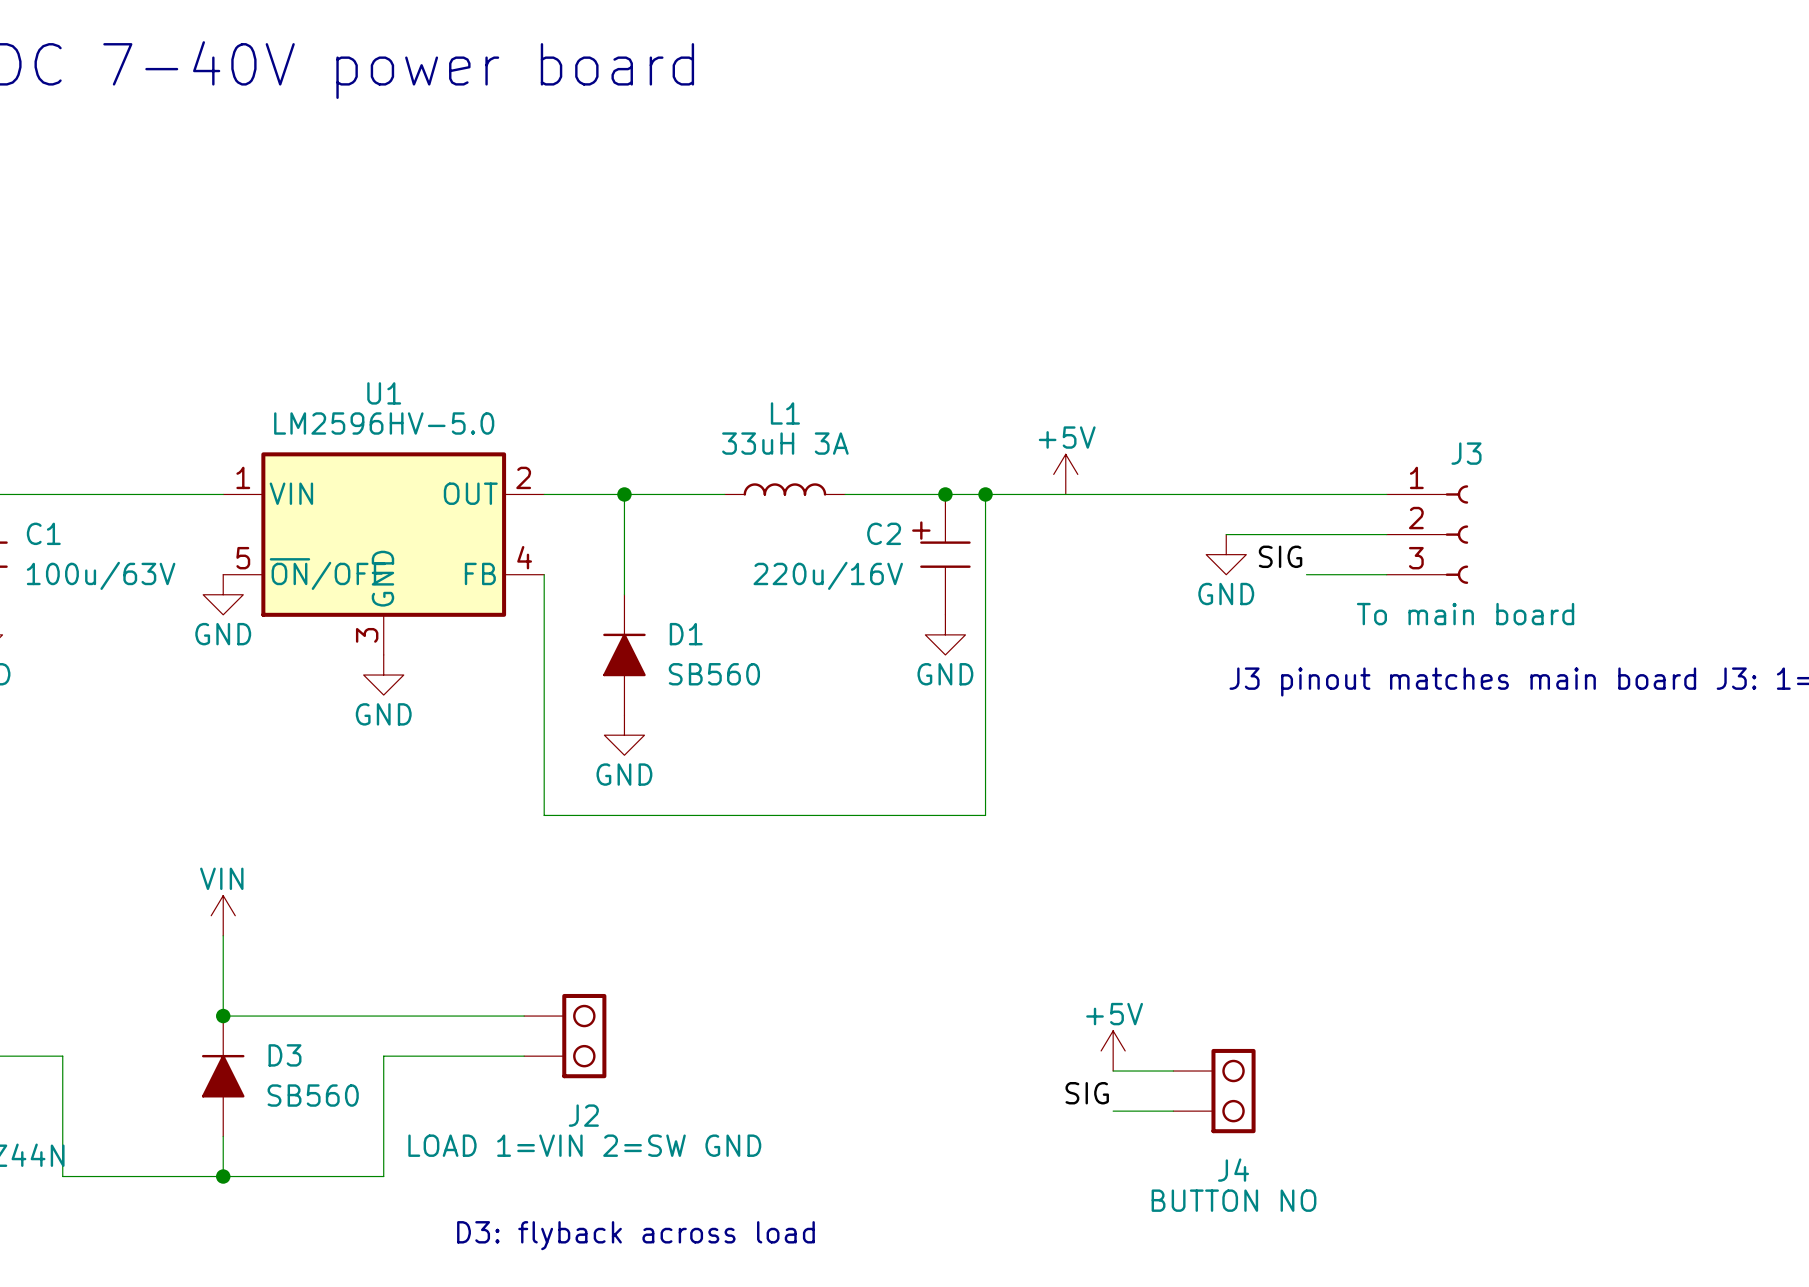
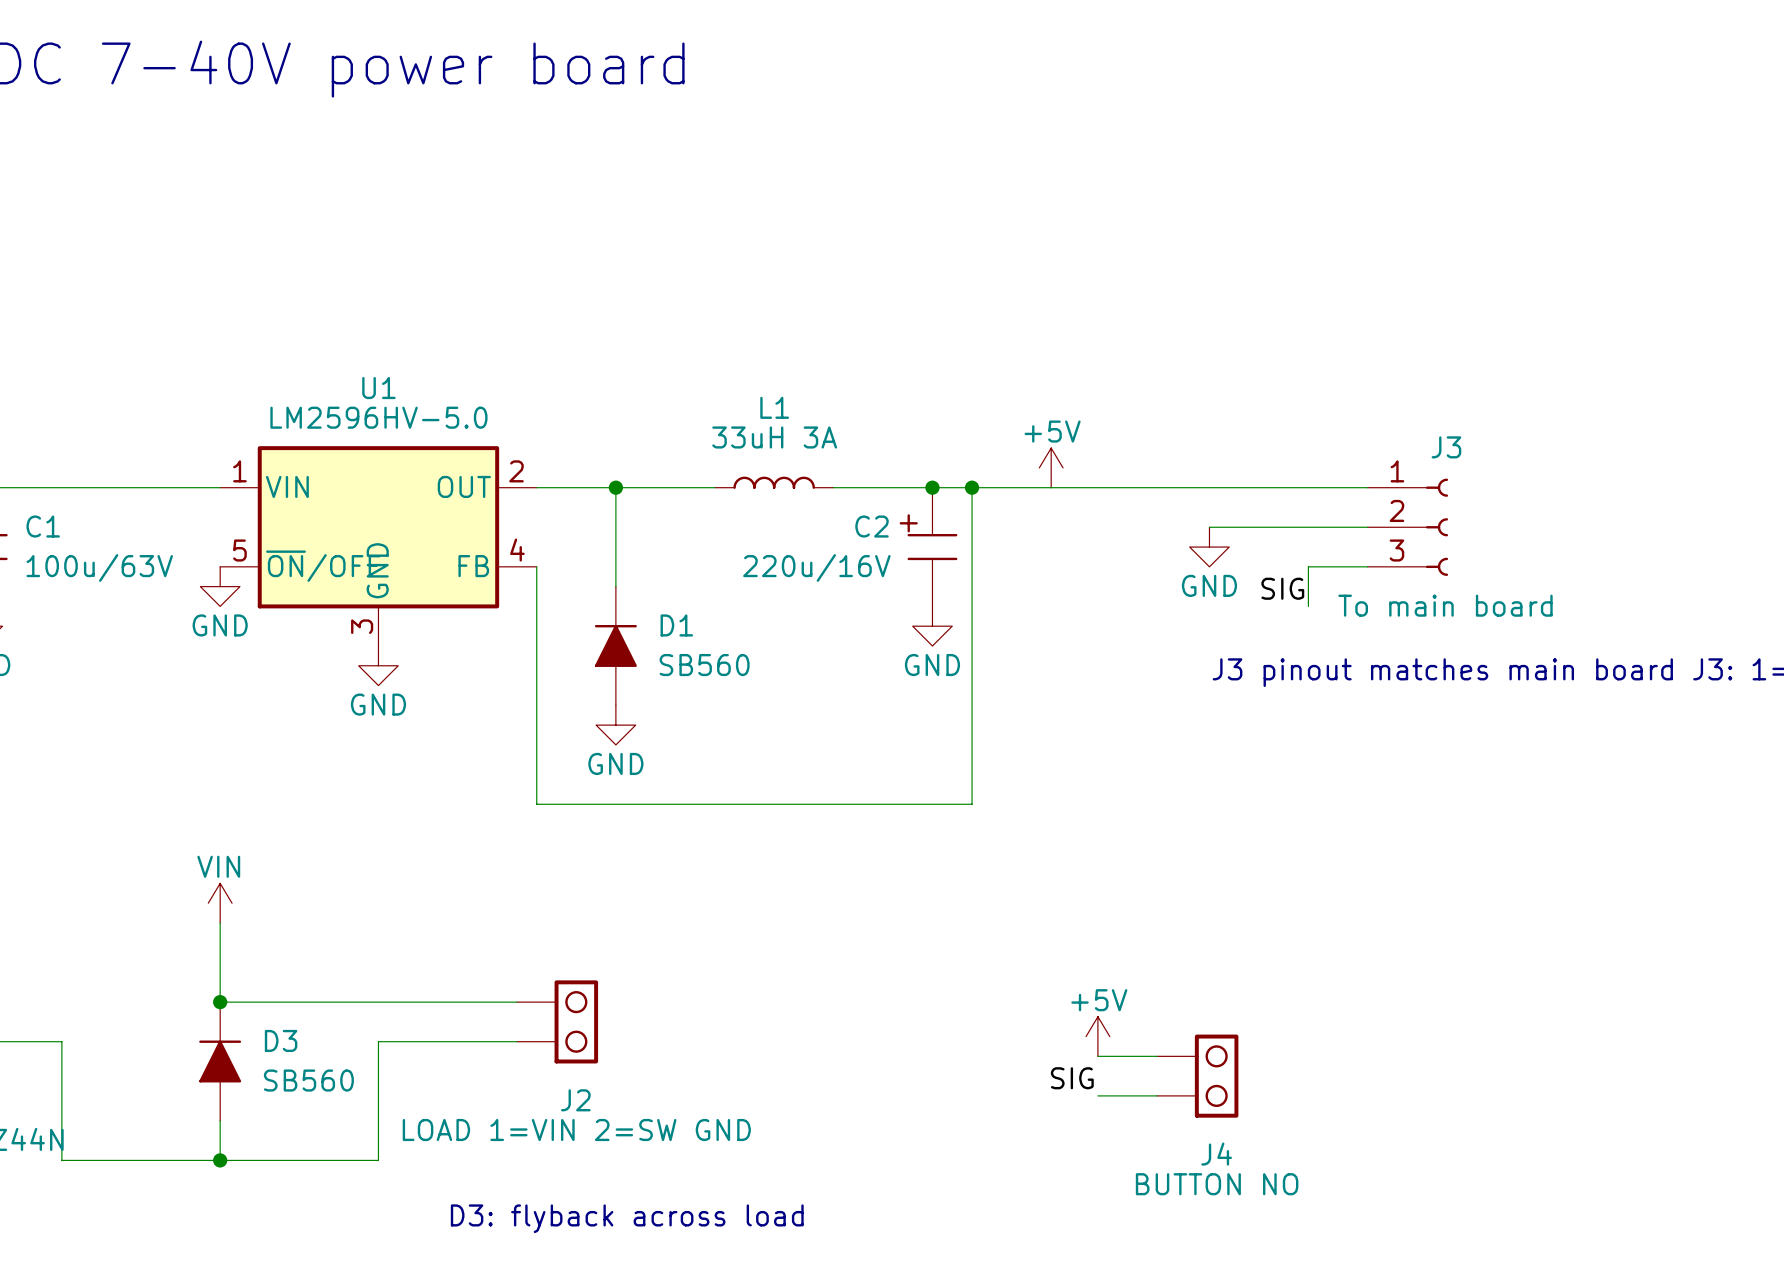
label position: SIG (1280, 556) -> SIG (1282, 588)
wire: (1306, 574) (1326, 574) -> (1308, 606) (1308, 566)

